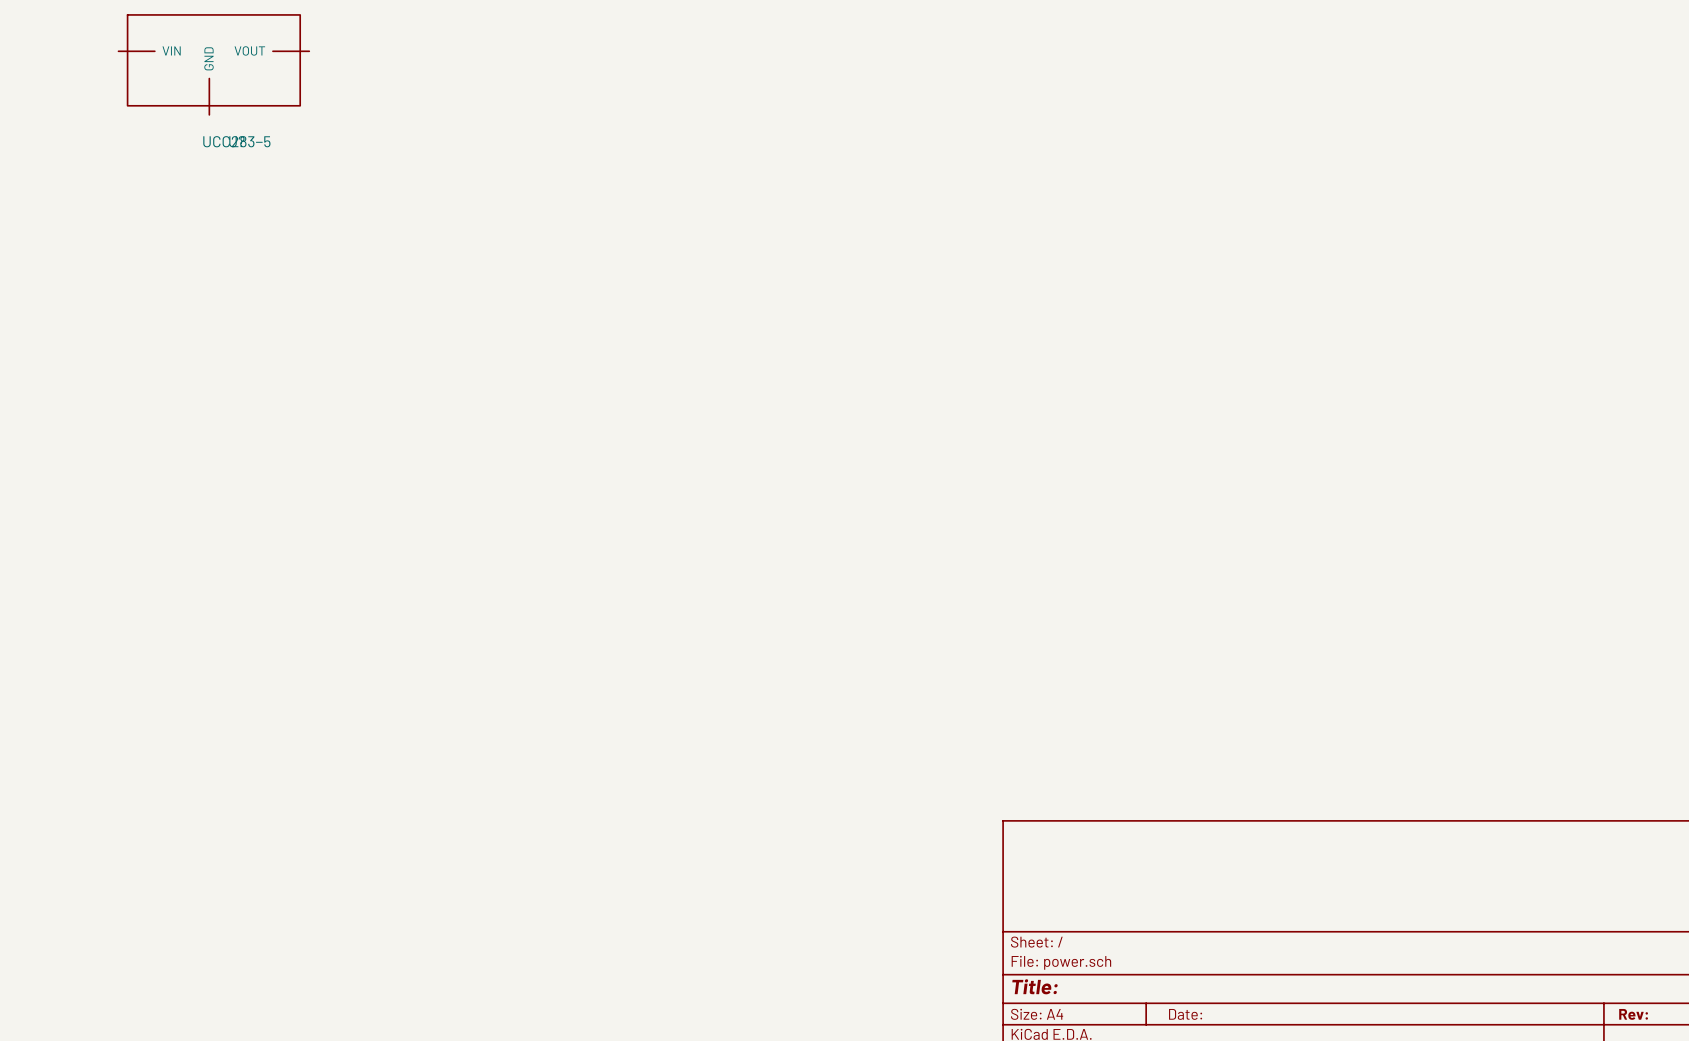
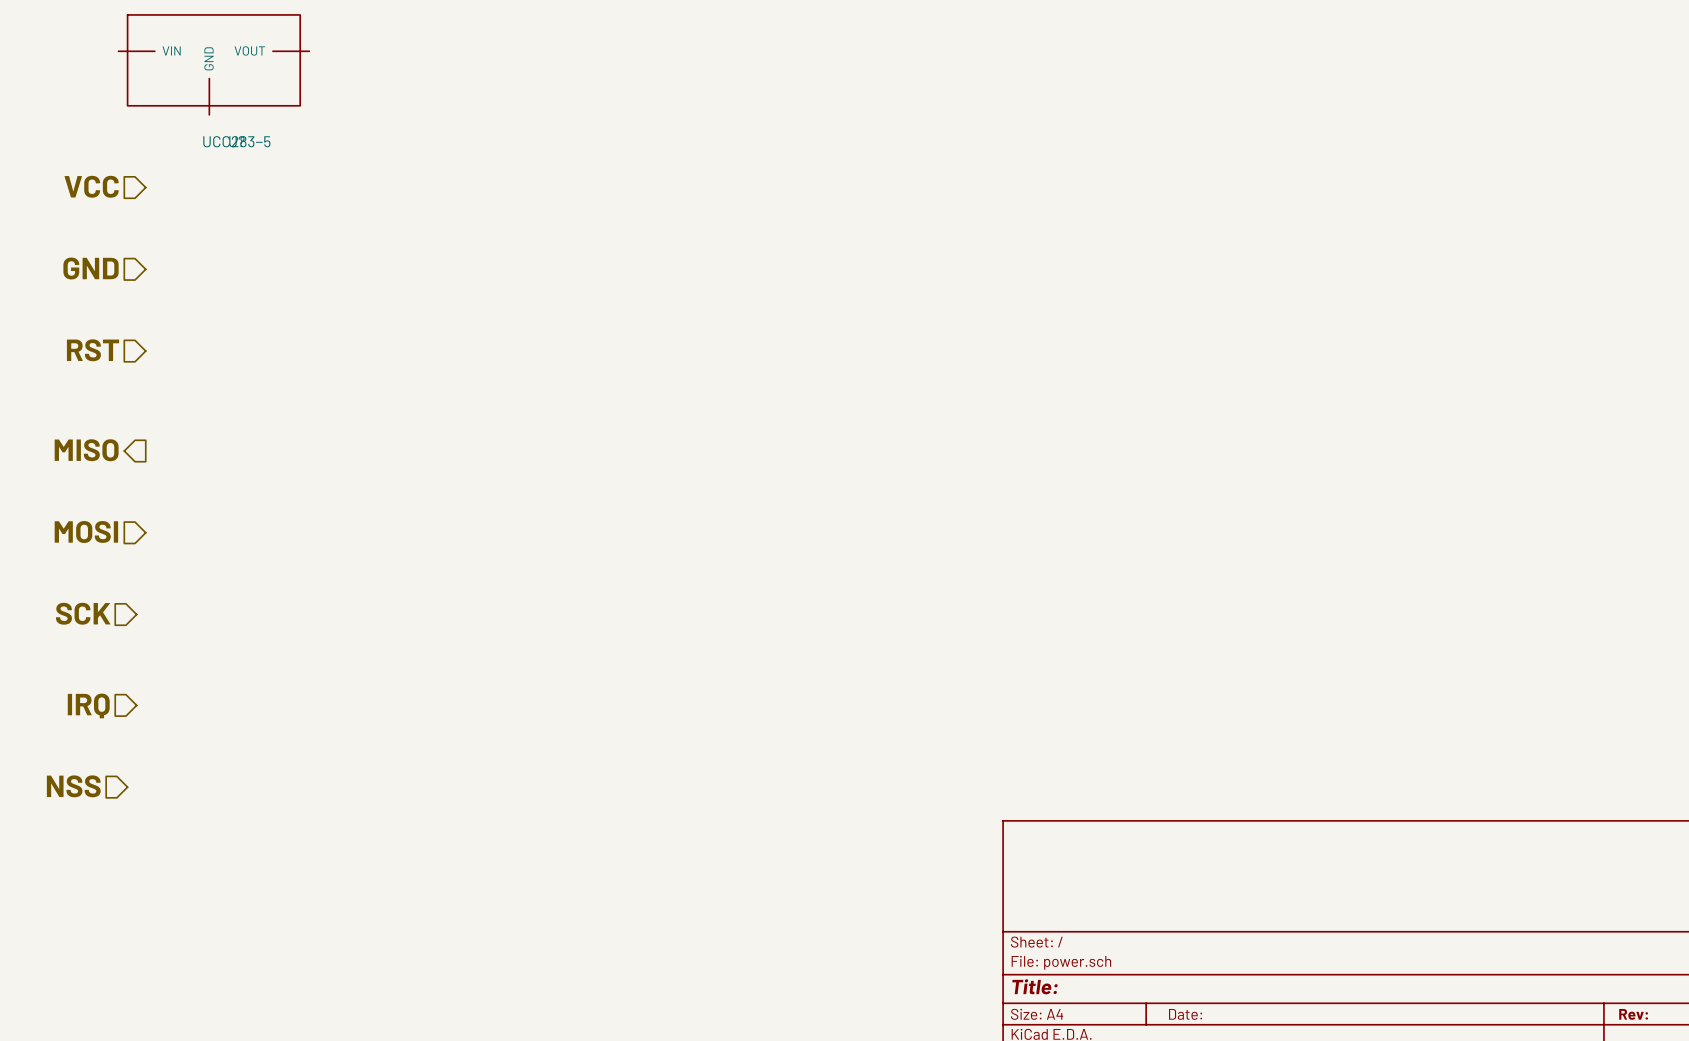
hierarchical label: none -> VCC (91, 186)
hierarchical label: none -> GND (91, 268)
hierarchical label: none -> RST (93, 350)
hierarchical label: none -> MISO (86, 450)
hierarchical label: none -> MOSI (86, 532)
hierarchical label: none -> SCK (83, 613)
hierarchical label: none -> IRQ (88, 705)
hierarchical label: none -> NSS (73, 786)

